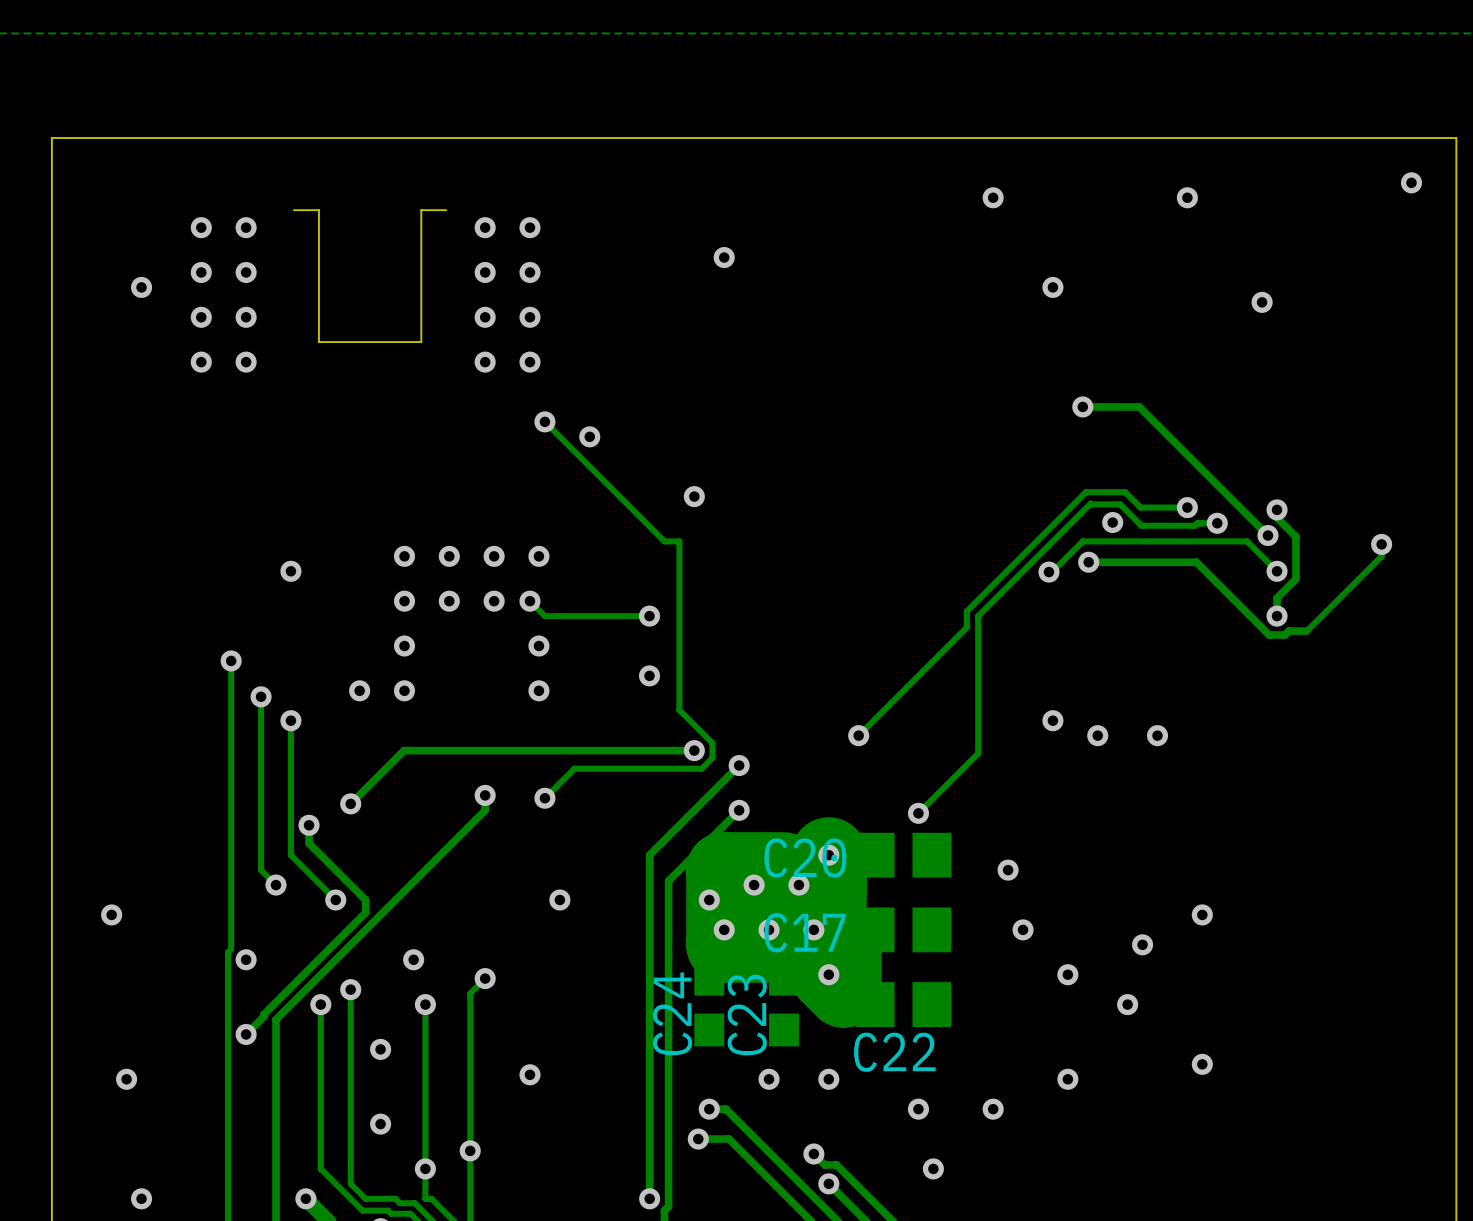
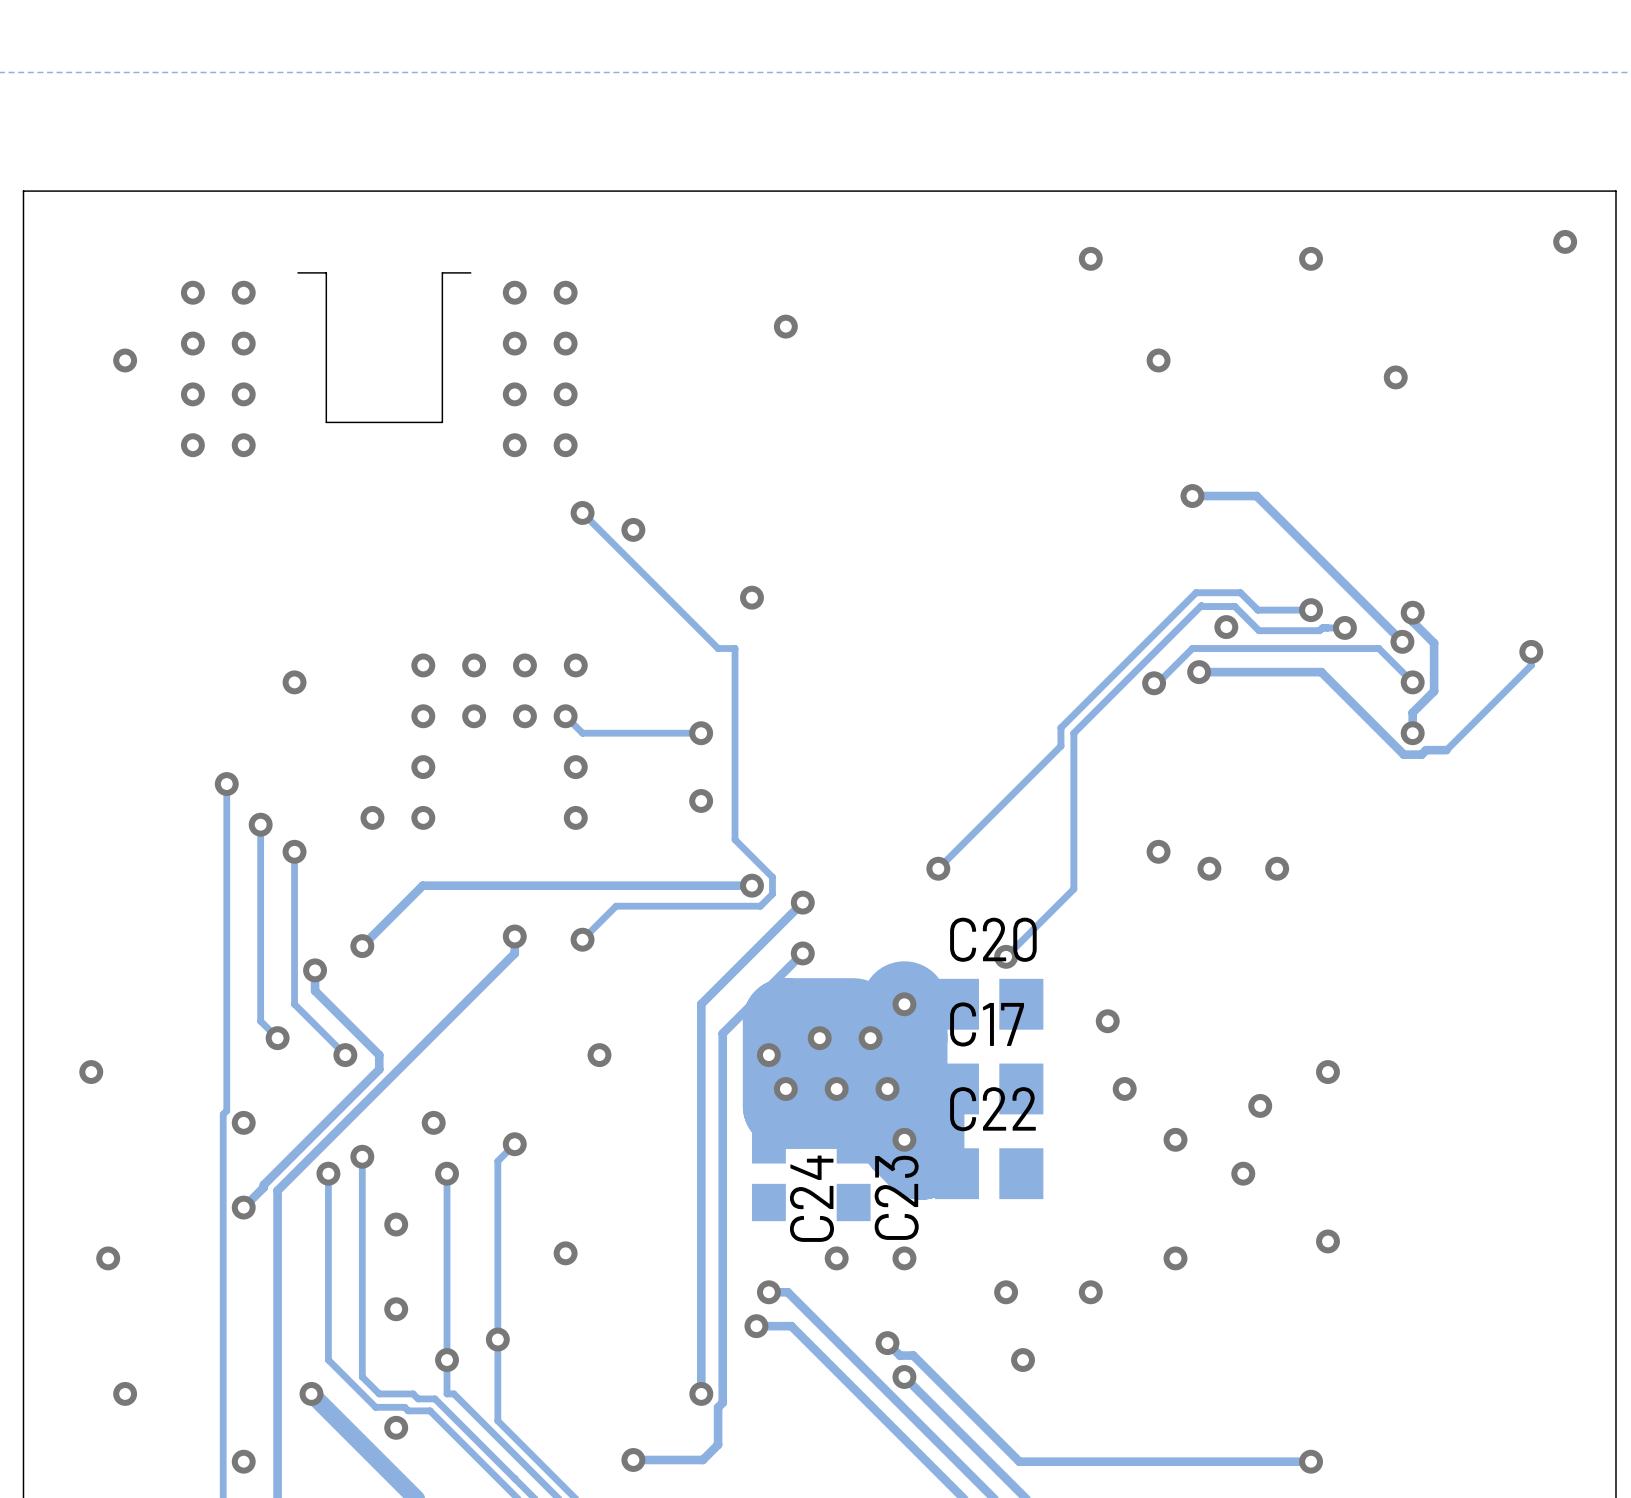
C20 name position: C20 (805, 858) -> C20 (993, 939)
C17 name position: C17 (805, 932) -> C17 (987, 1024)
C24 name position: C24 (672, 1013) -> C24 (811, 1198)
C23 name position: C23 (747, 1015) -> C23 (896, 1197)
C22 name position: C22 (894, 1052) -> C22 (992, 1109)

